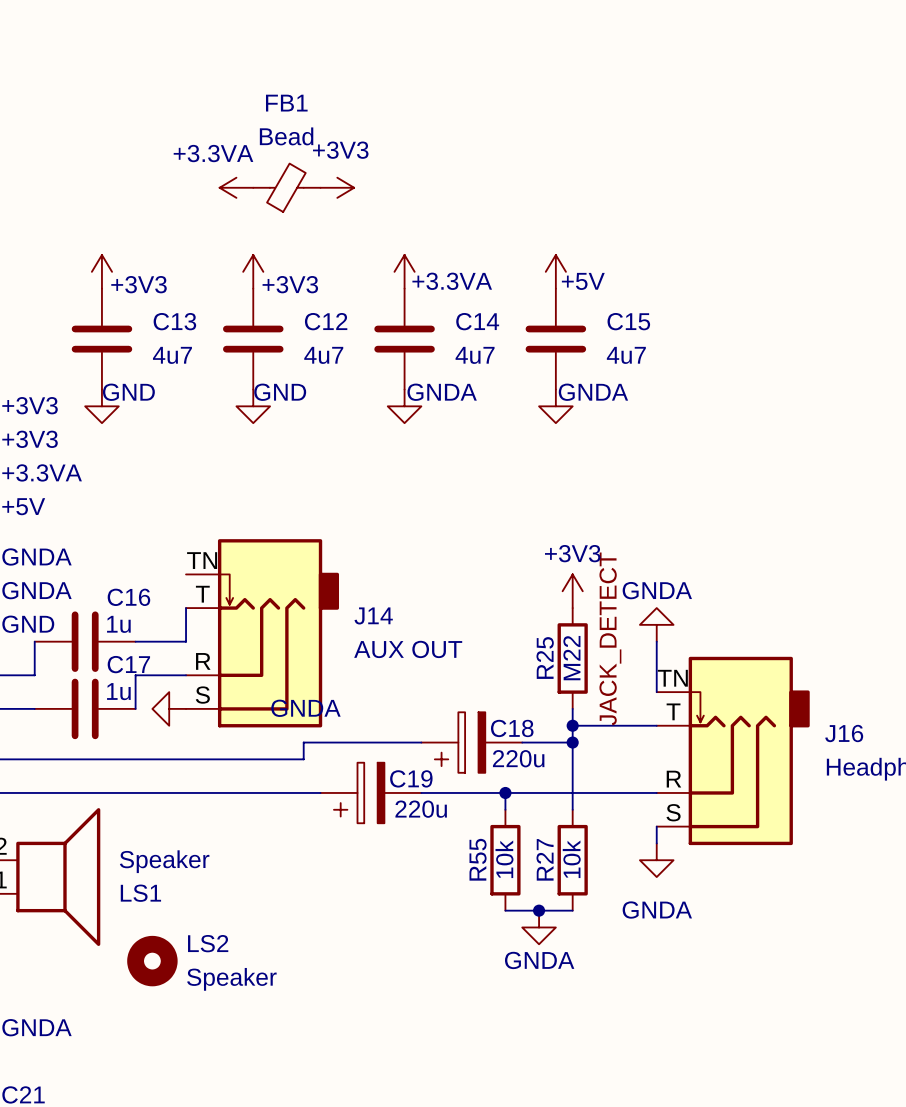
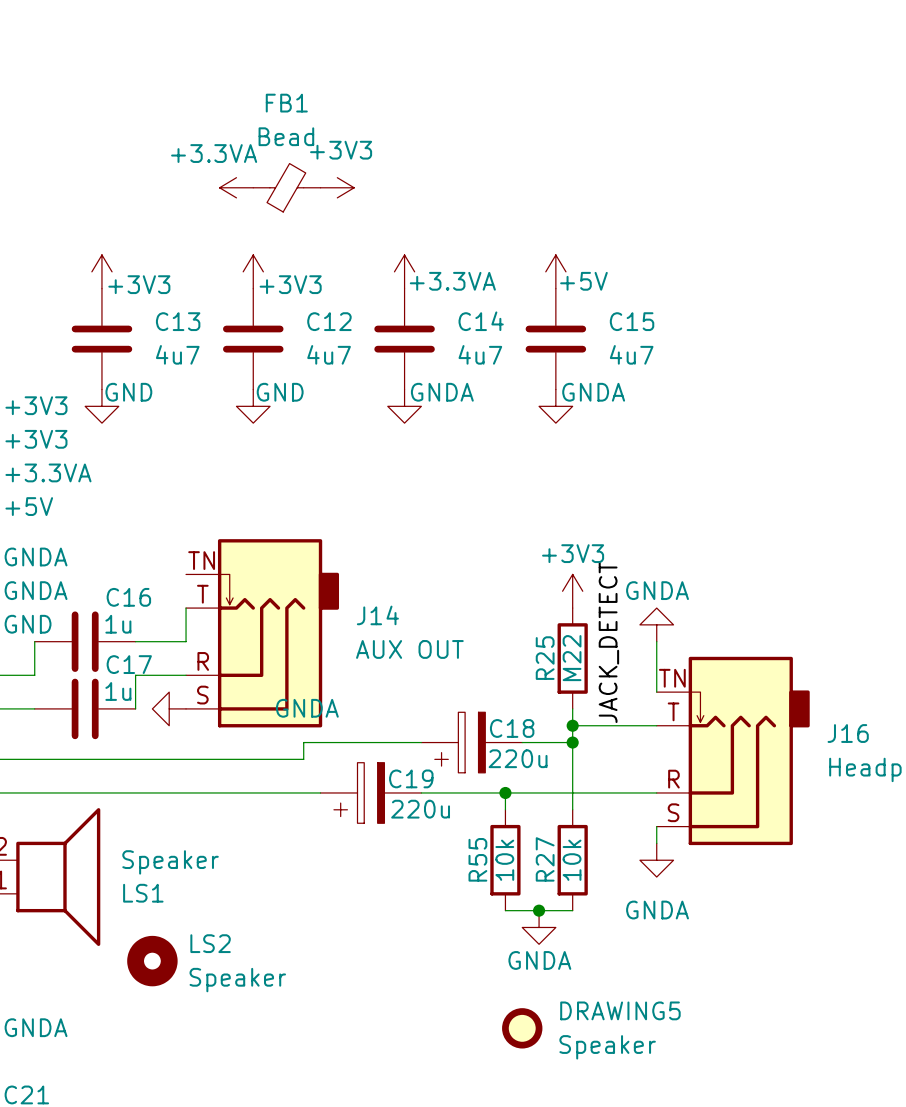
DRAWING5: none -> Speaker (522, 1028)

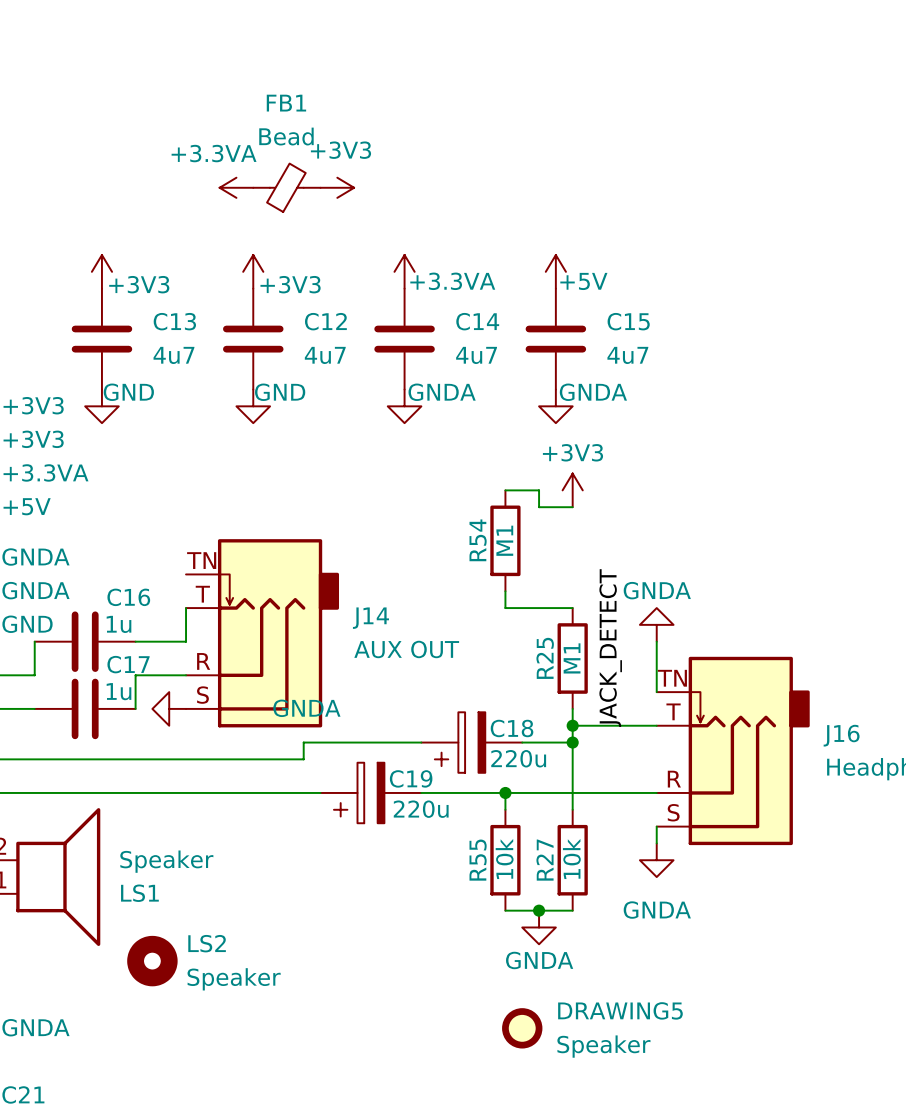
wire: none -> (505, 490) (539, 490) (539, 507) (572, 507)
R54: none -> M1 (505, 540)
wire: none -> (505, 591) (505, 608) (572, 608)
power symbol position: +3V3 (572, 591) -> +3V3 (572, 490)
R25 value: M22 (572, 658) -> M1 (572, 658)

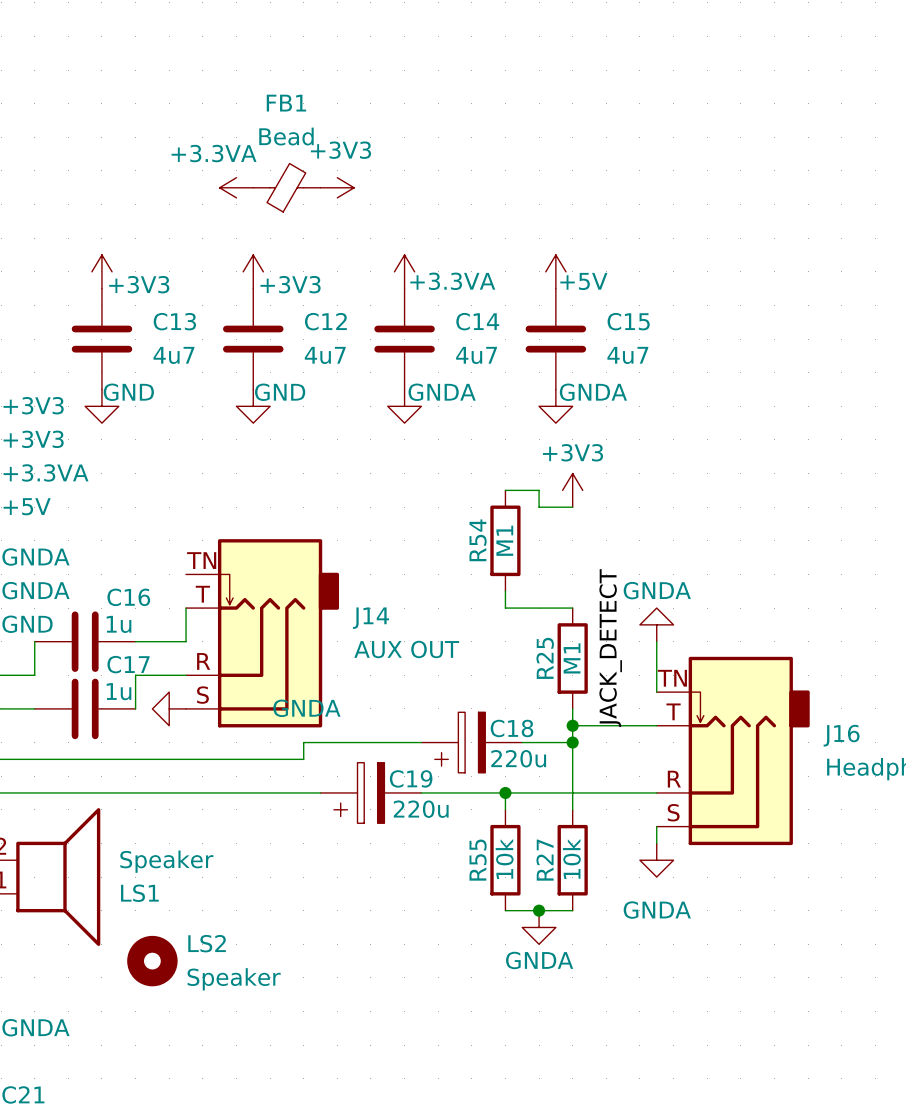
DRAWING5: Speaker (522, 1028) -> none

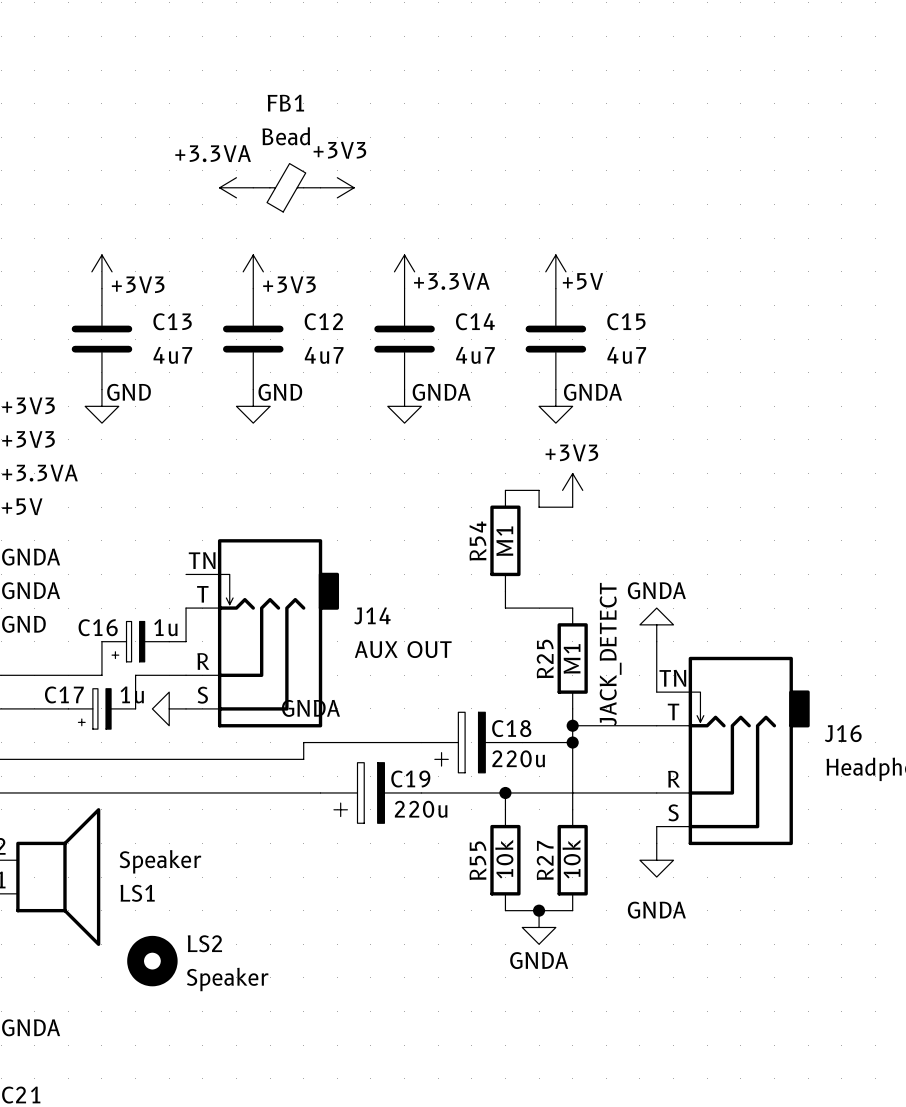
C16 name position: C16 (128, 597) -> C16 (98, 627)
C16 symbol: [34, 611, 136, 672] -> [101, 621, 170, 662]
wire: (34, 641) (34, 675) -> (101, 641) (101, 675) (34, 675)
C17 name position: C17 (128, 664) -> C17 (64, 694)
C17 symbol: [34, 678, 136, 740] -> [68, 688, 136, 730]

